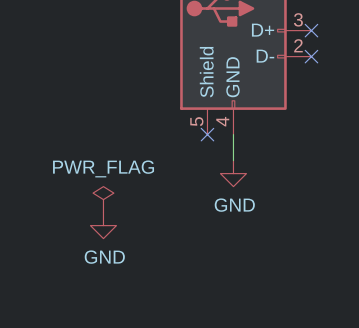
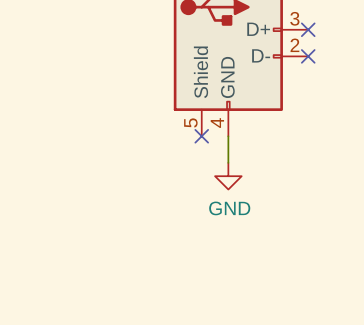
power symbol: PWR_FLAG (103, 199) -> none
power symbol: GND (103, 225) -> none

